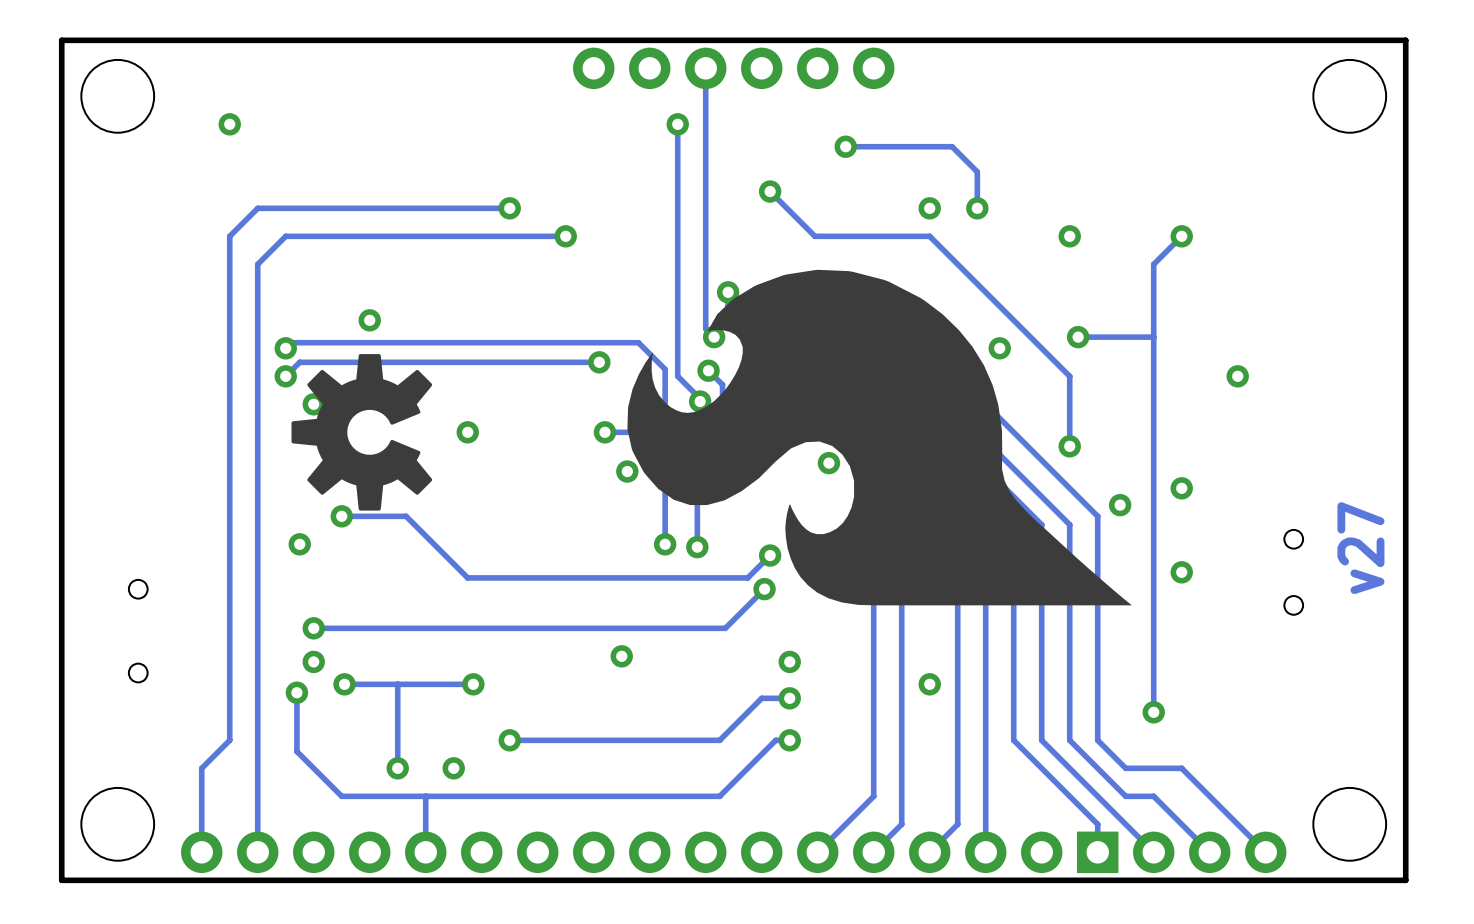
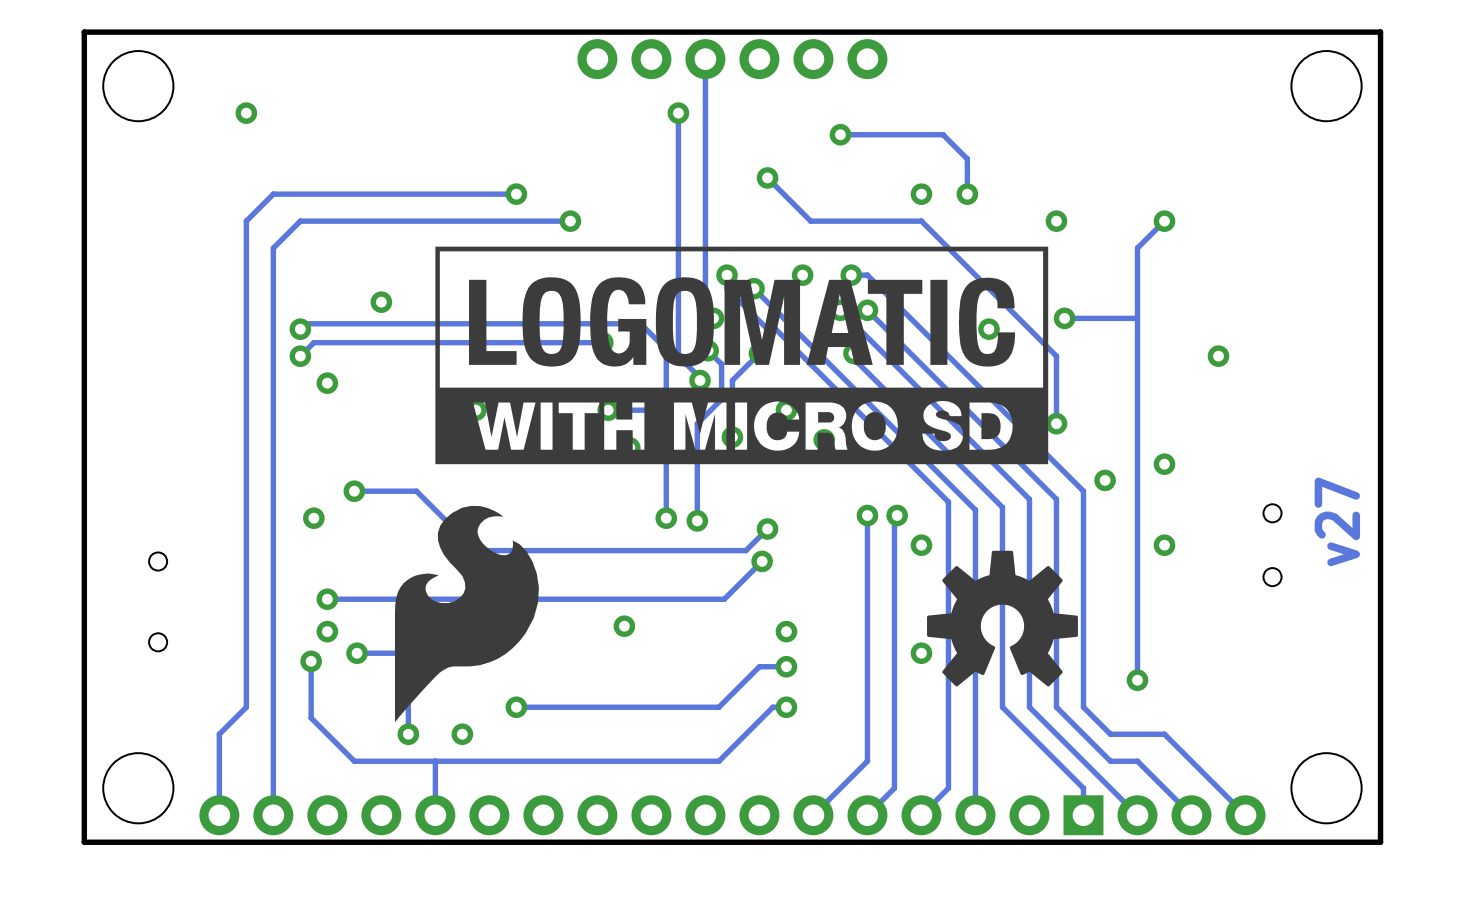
drawing: none -> [435, 246, 1049, 465]
drawing: [627, 269, 1132, 606] -> none
drawing: [291, 354, 433, 511] -> none
drawing: none -> [394, 505, 539, 723]
drawing: none -> [927, 550, 1078, 687]

